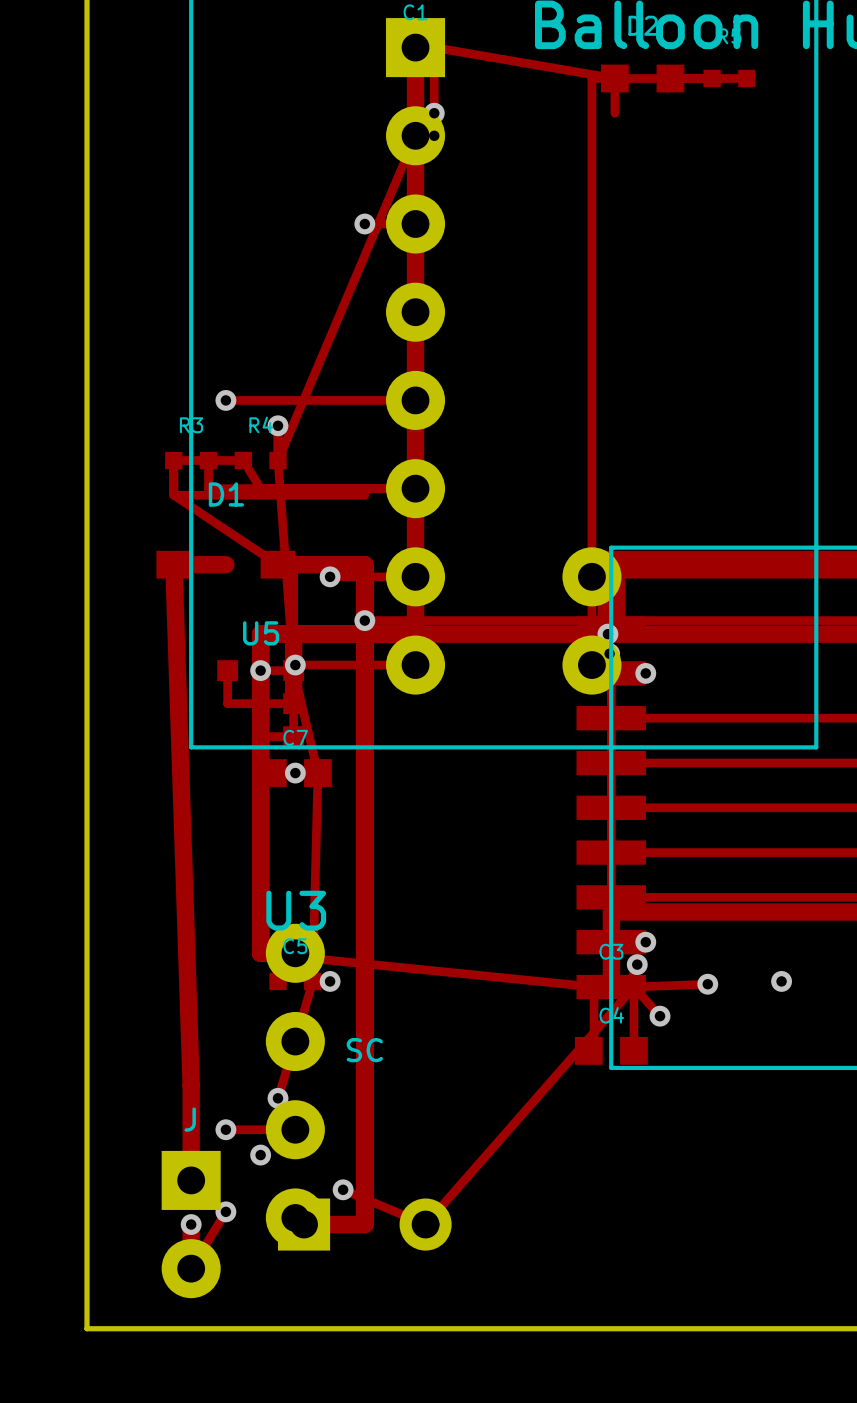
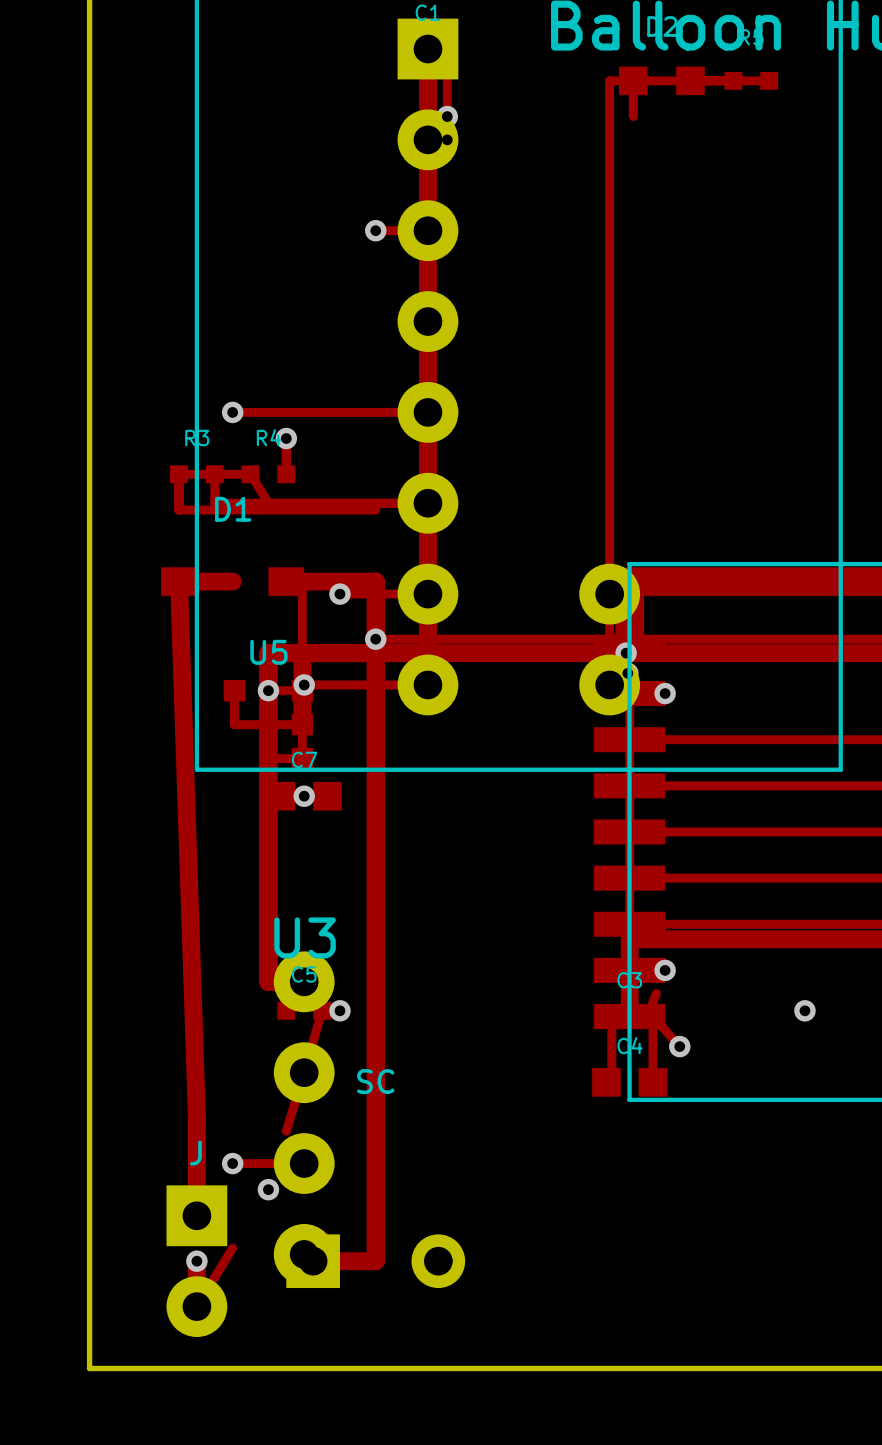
track: (434, 47) (614, 78) -> none
track: (415, 135) (278, 460) (293, 670) (317, 773) (312, 981) -> none
track: (173, 495) (278, 564) -> none
track: (260, 953) (594, 986) -> none
via: (637, 964) -> none
track: (707, 984) (633, 986) (425, 1224) (343, 1189) -> none
via: (707, 984) -> none
via: (278, 1098) -> none
via: (343, 1189) -> none
via: (225, 1211) -> none

